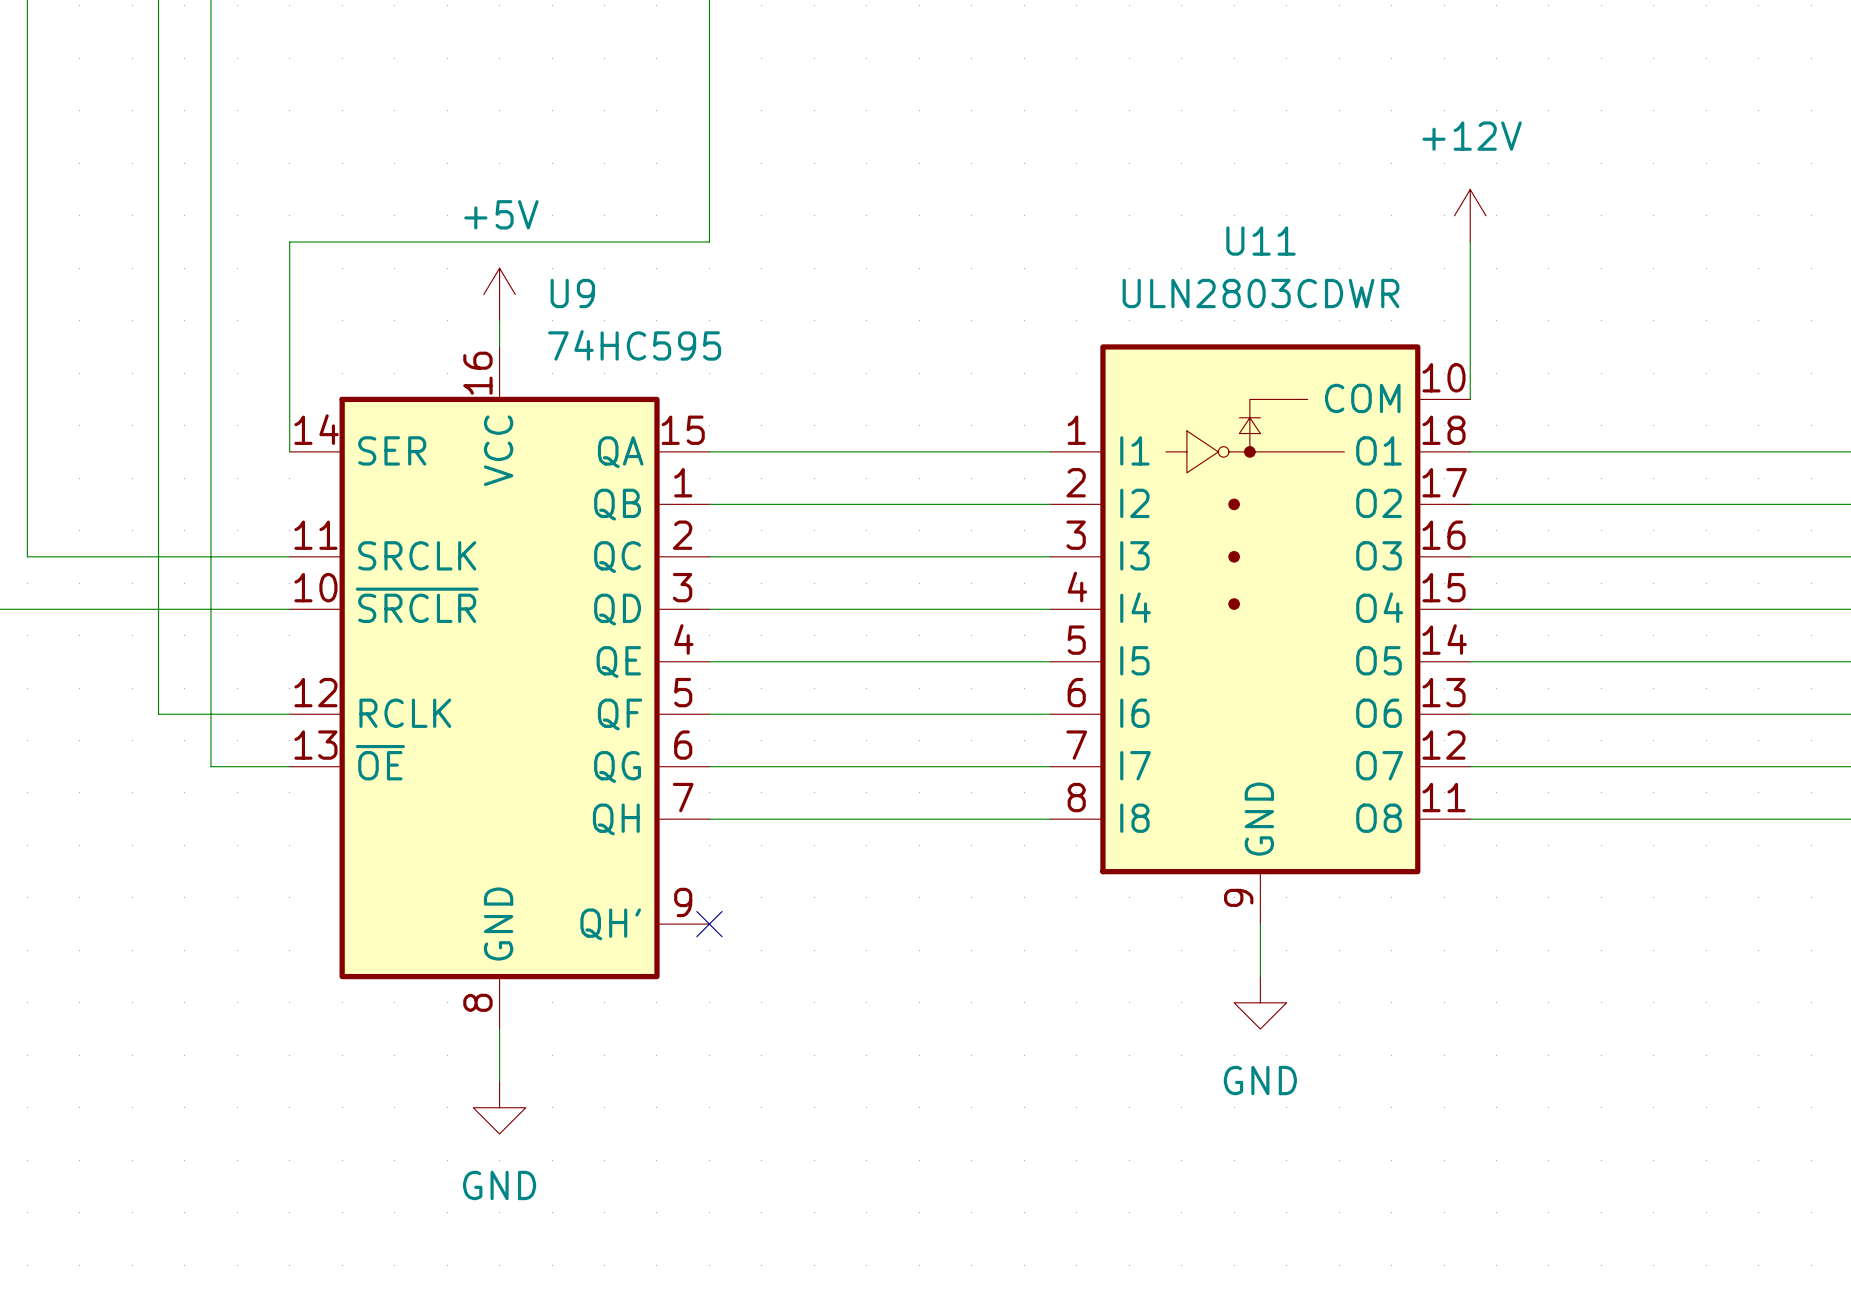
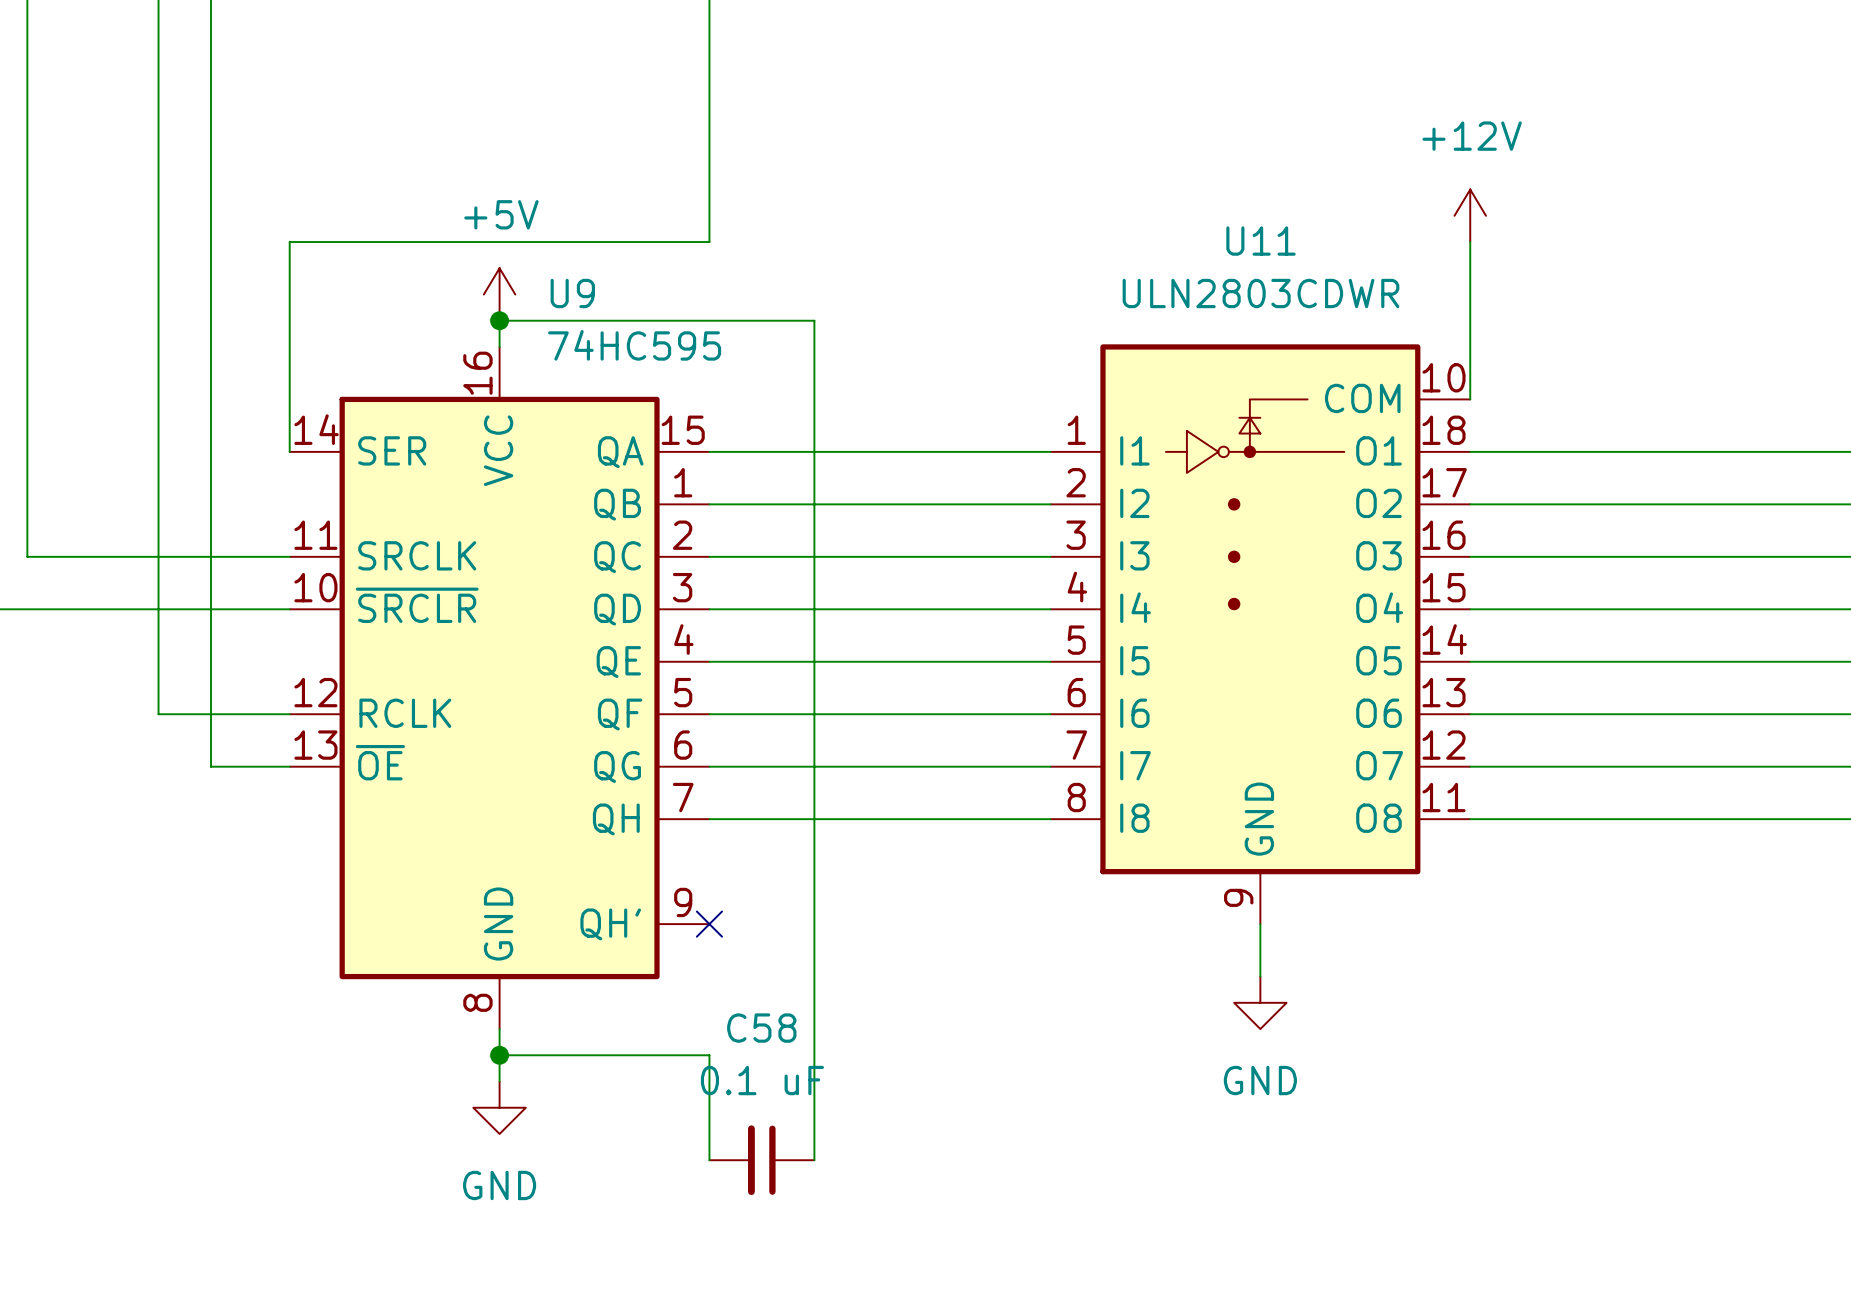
wire: none -> (499, 320) (814, 320) (814, 1160)
junction: none -> (499, 320)
wire: none -> (499, 1055) (709, 1055) (709, 1160)
junction: none -> (499, 1055)
C58: none -> 0.1 uF (761, 1160)

